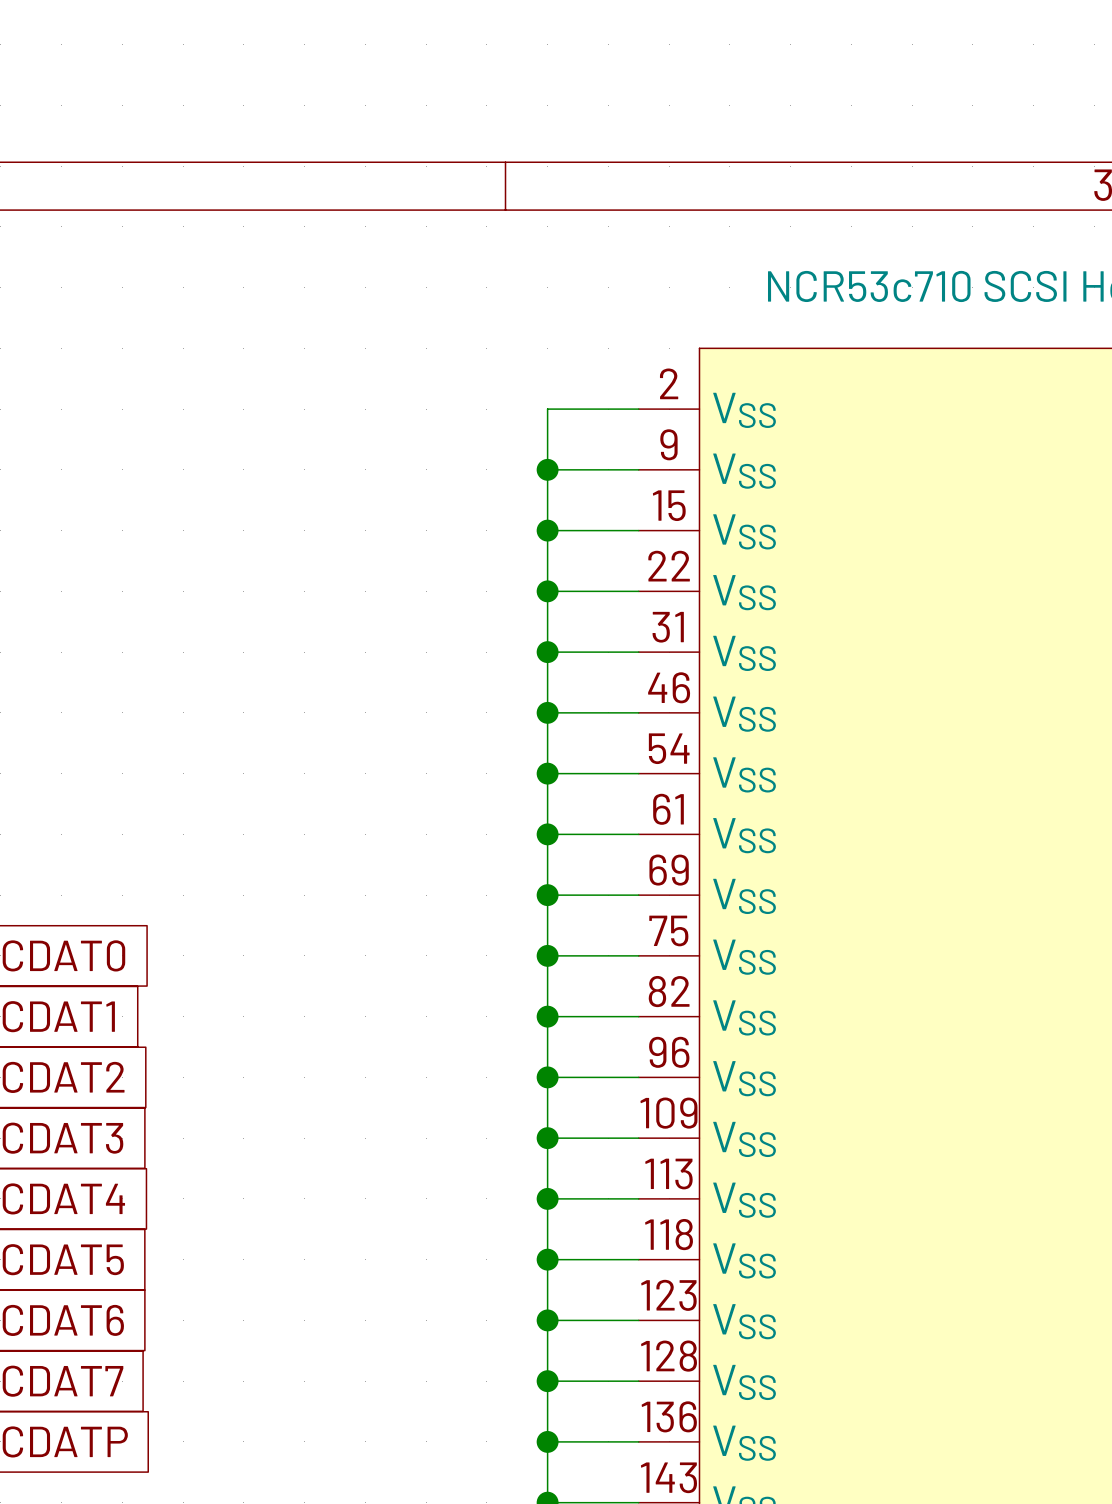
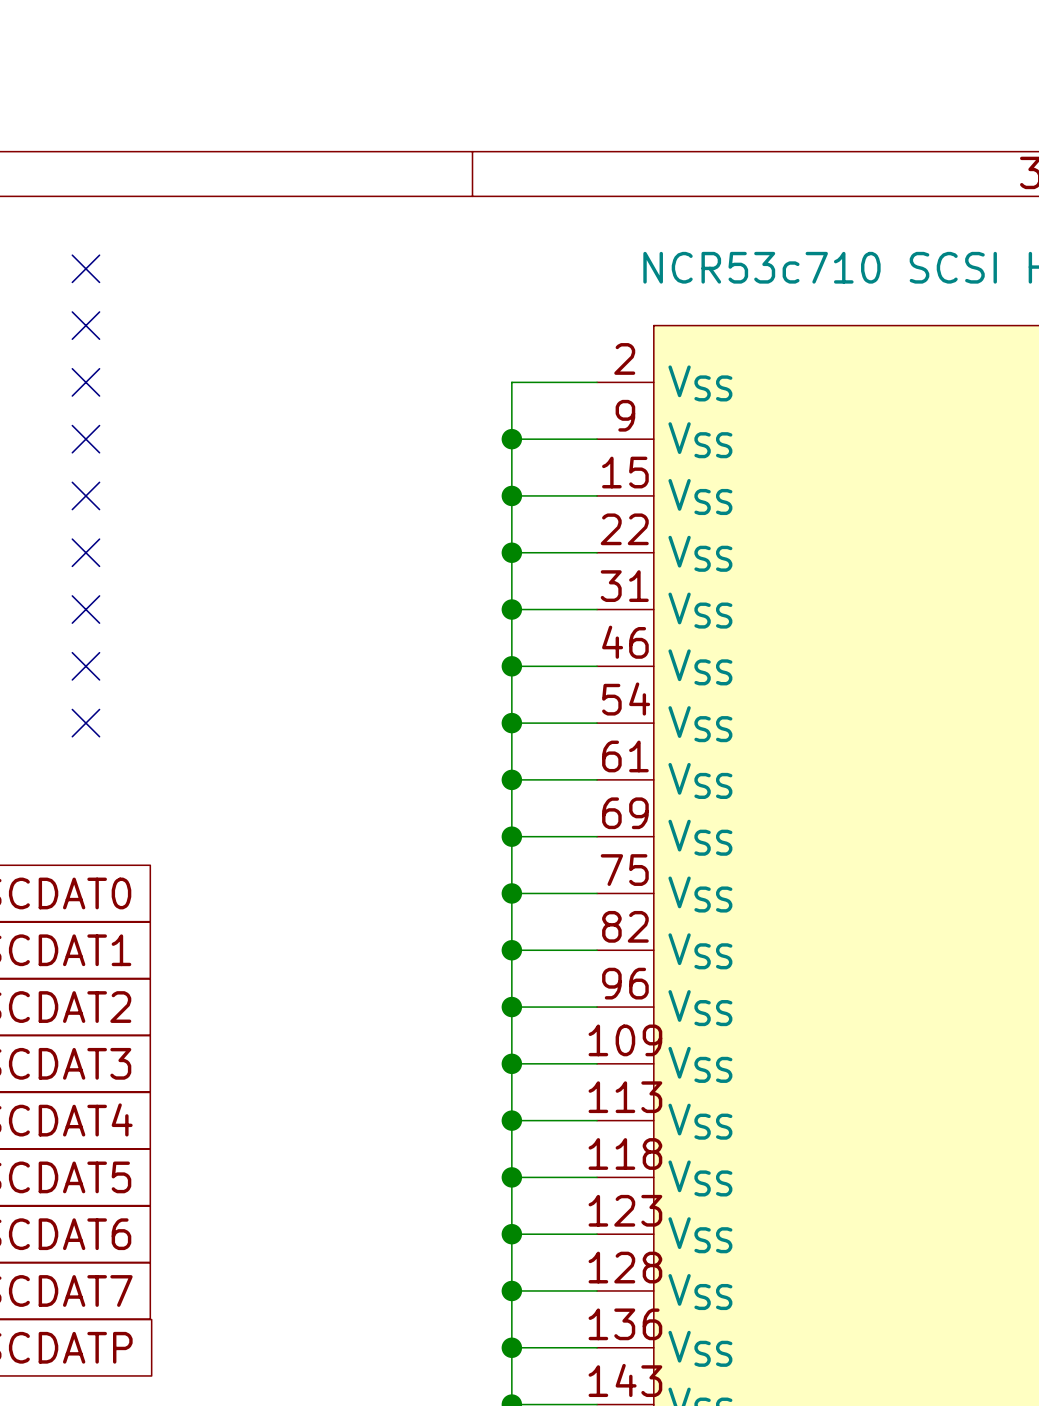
no-connect mark: none -> (85, 268)
no-connect mark: none -> (85, 325)
no-connect mark: none -> (85, 382)
no-connect mark: none -> (85, 439)
no-connect mark: none -> (85, 495)
no-connect mark: none -> (85, 552)
no-connect mark: none -> (85, 609)
no-connect mark: none -> (85, 666)
no-connect mark: none -> (85, 723)

